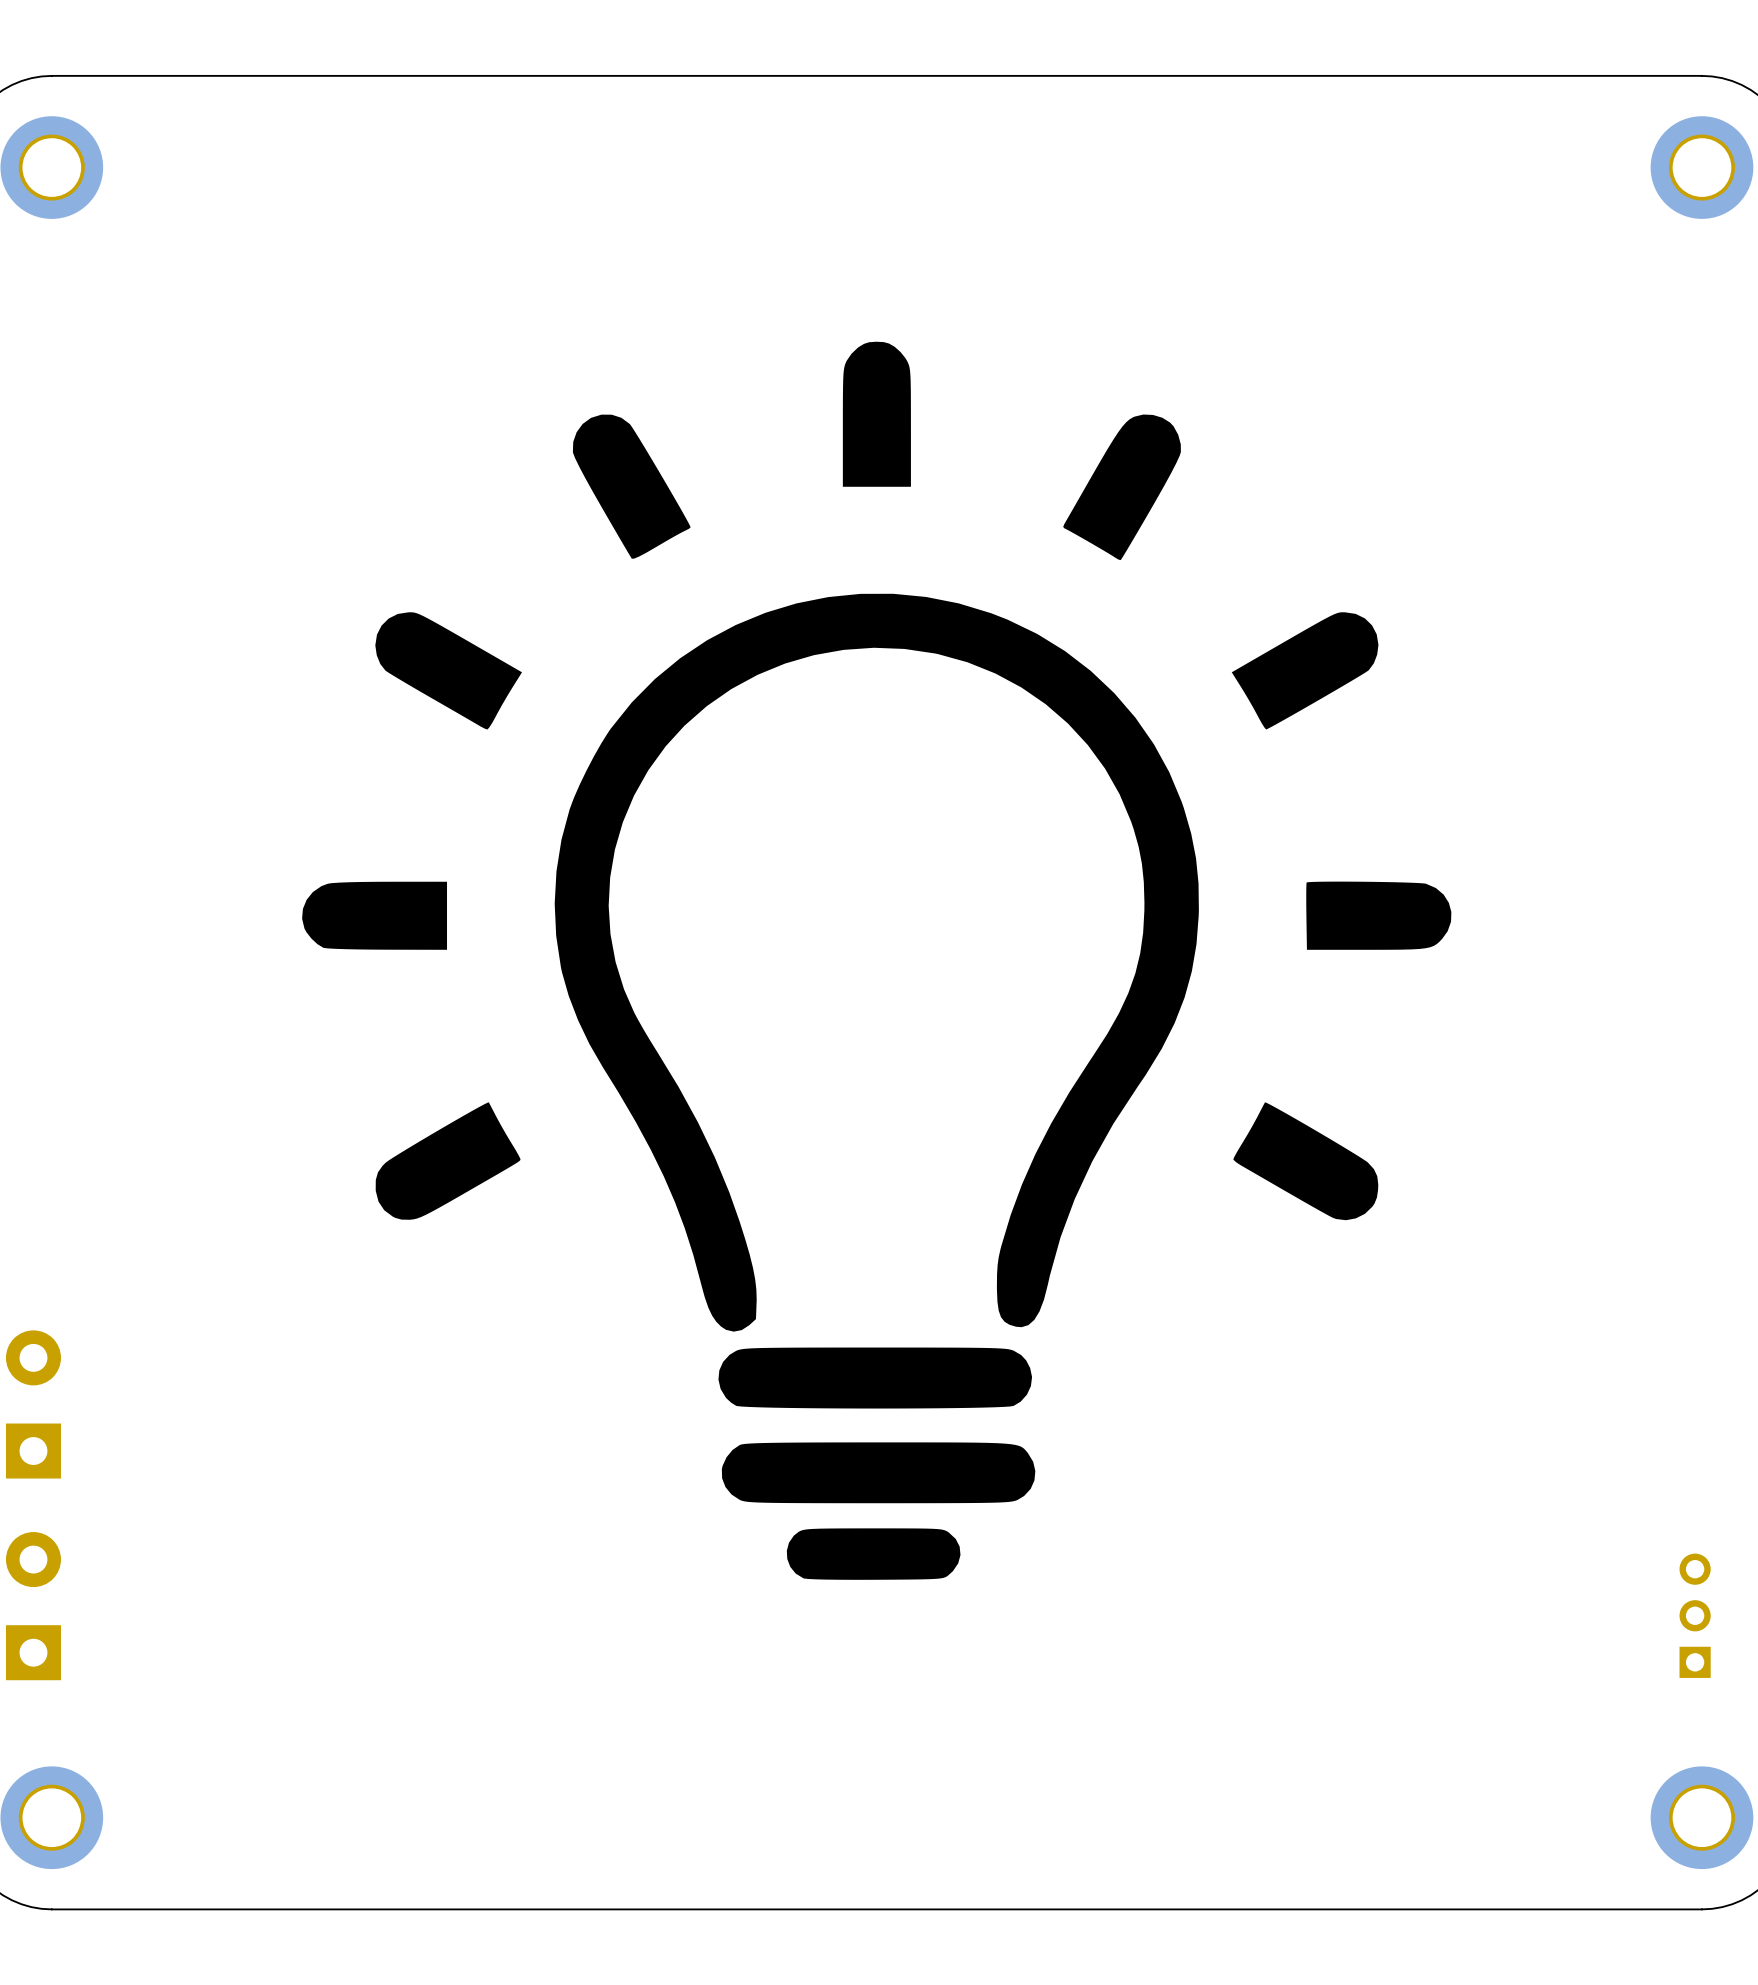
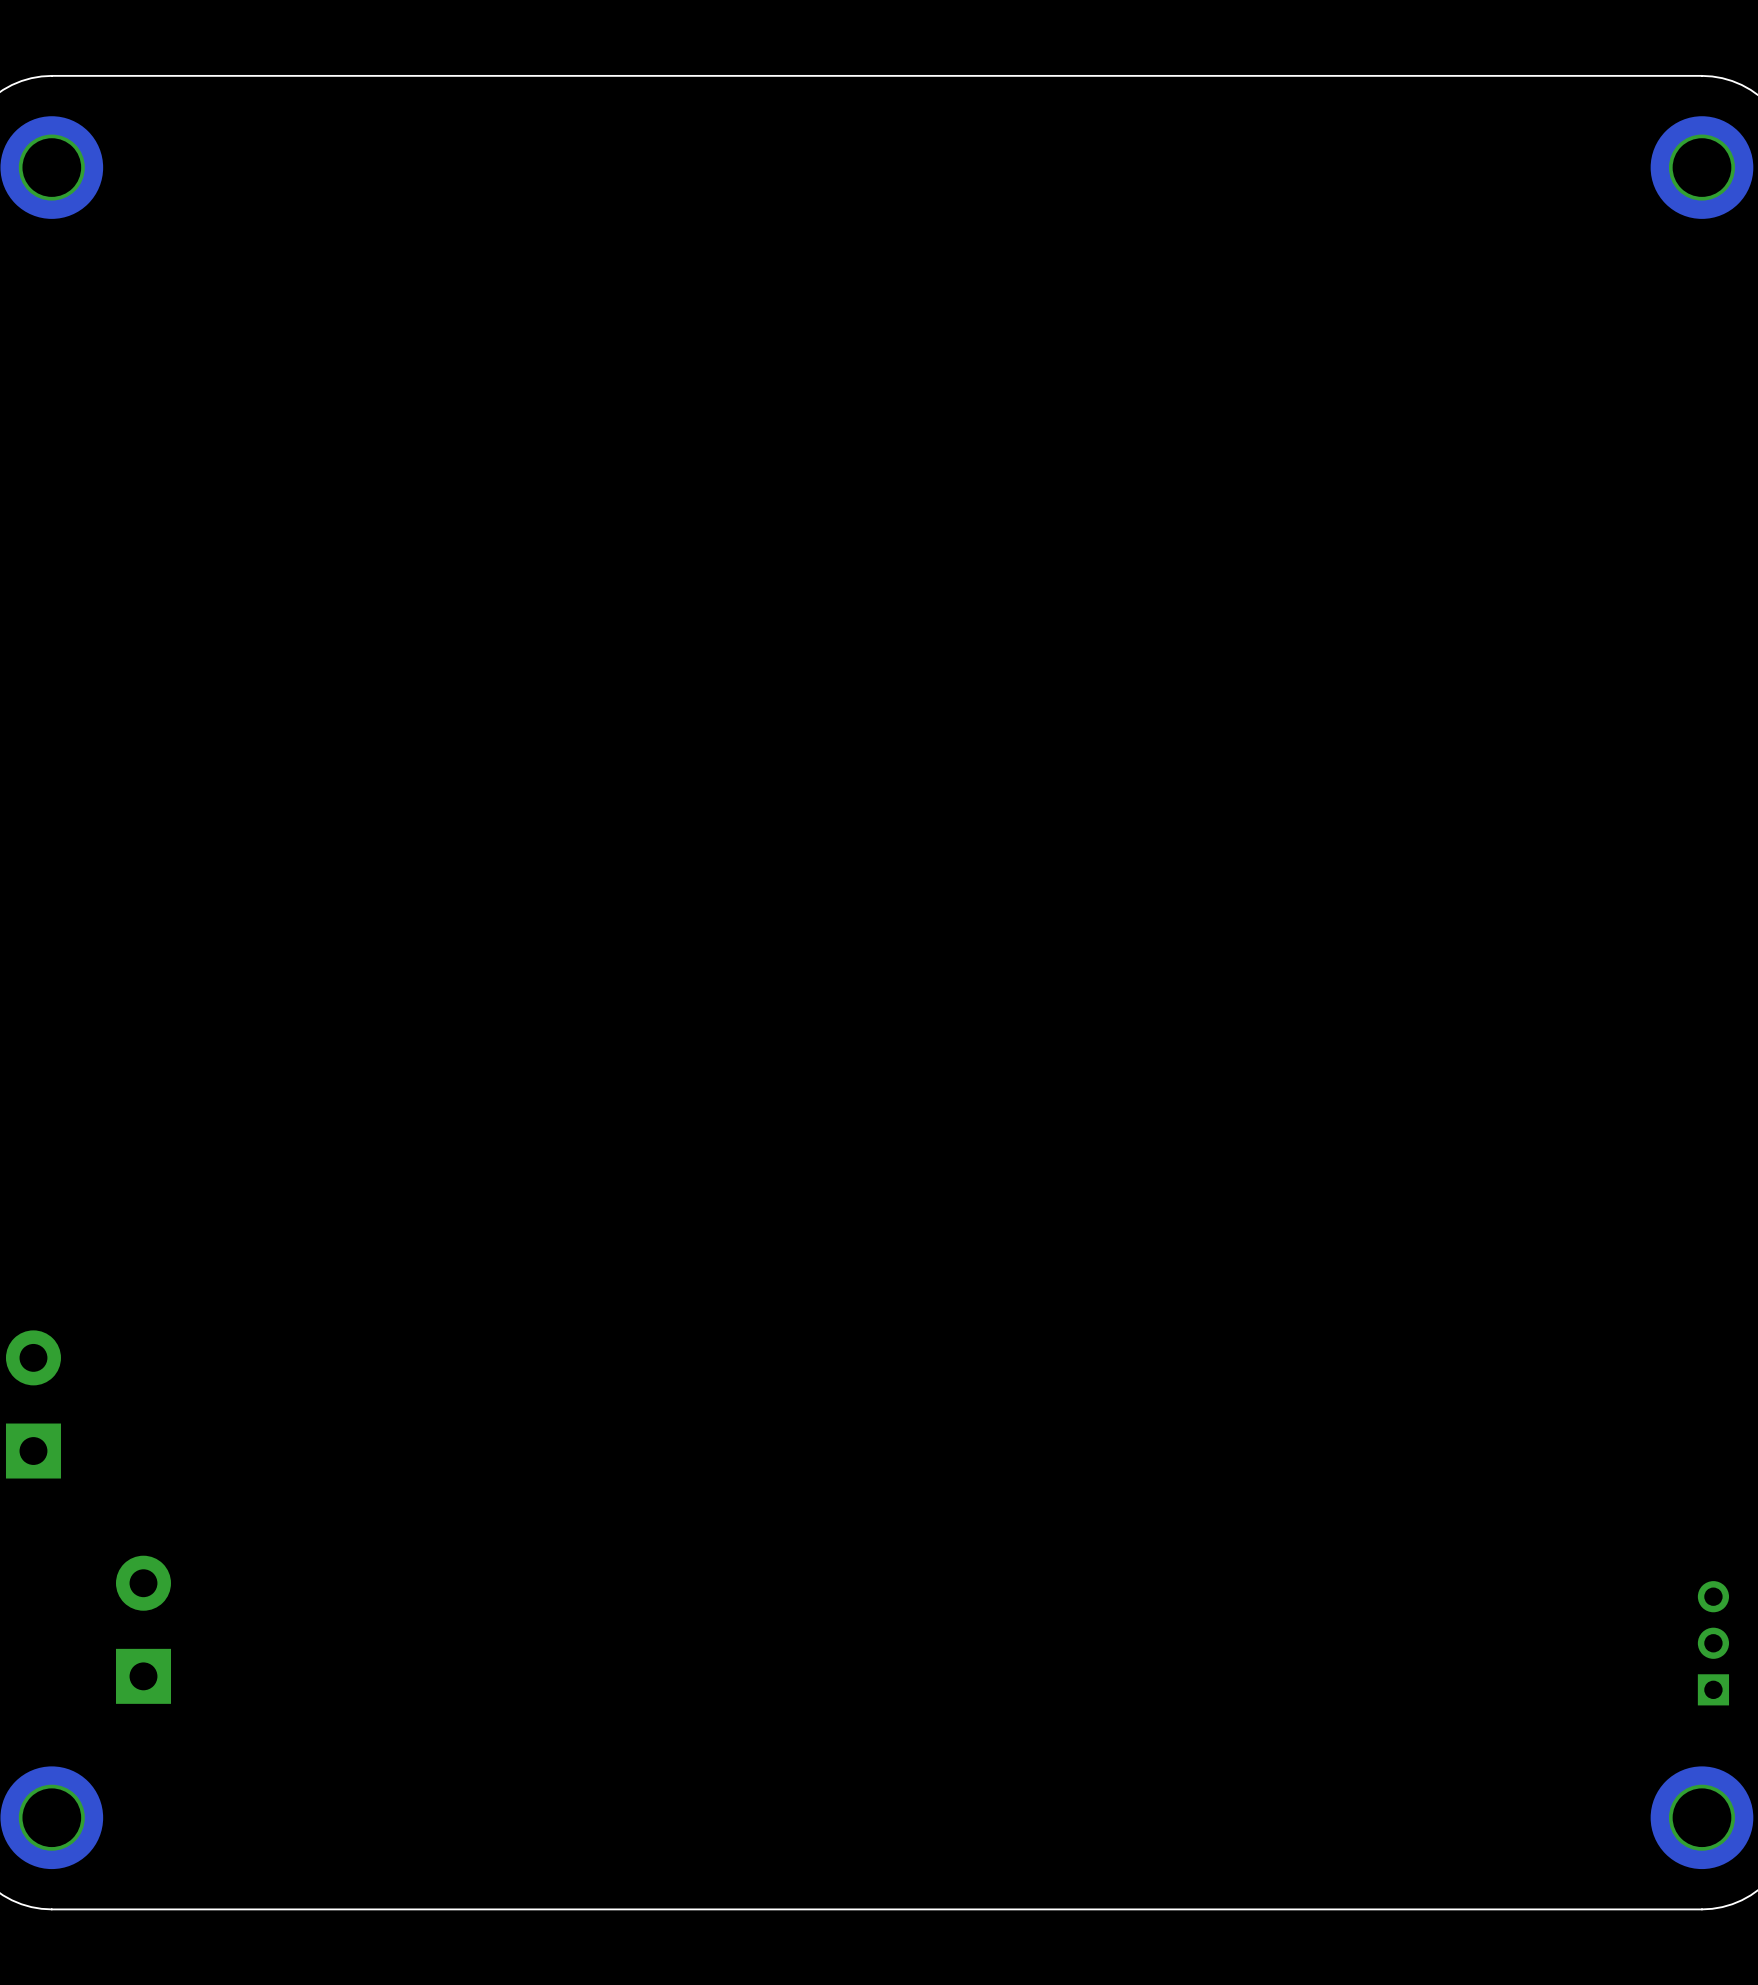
drawing: [302, 341, 1452, 1580] -> none
part position: (33, 1606) -> (143, 1629)
part position: (1695, 1615) -> (1713, 1643)

